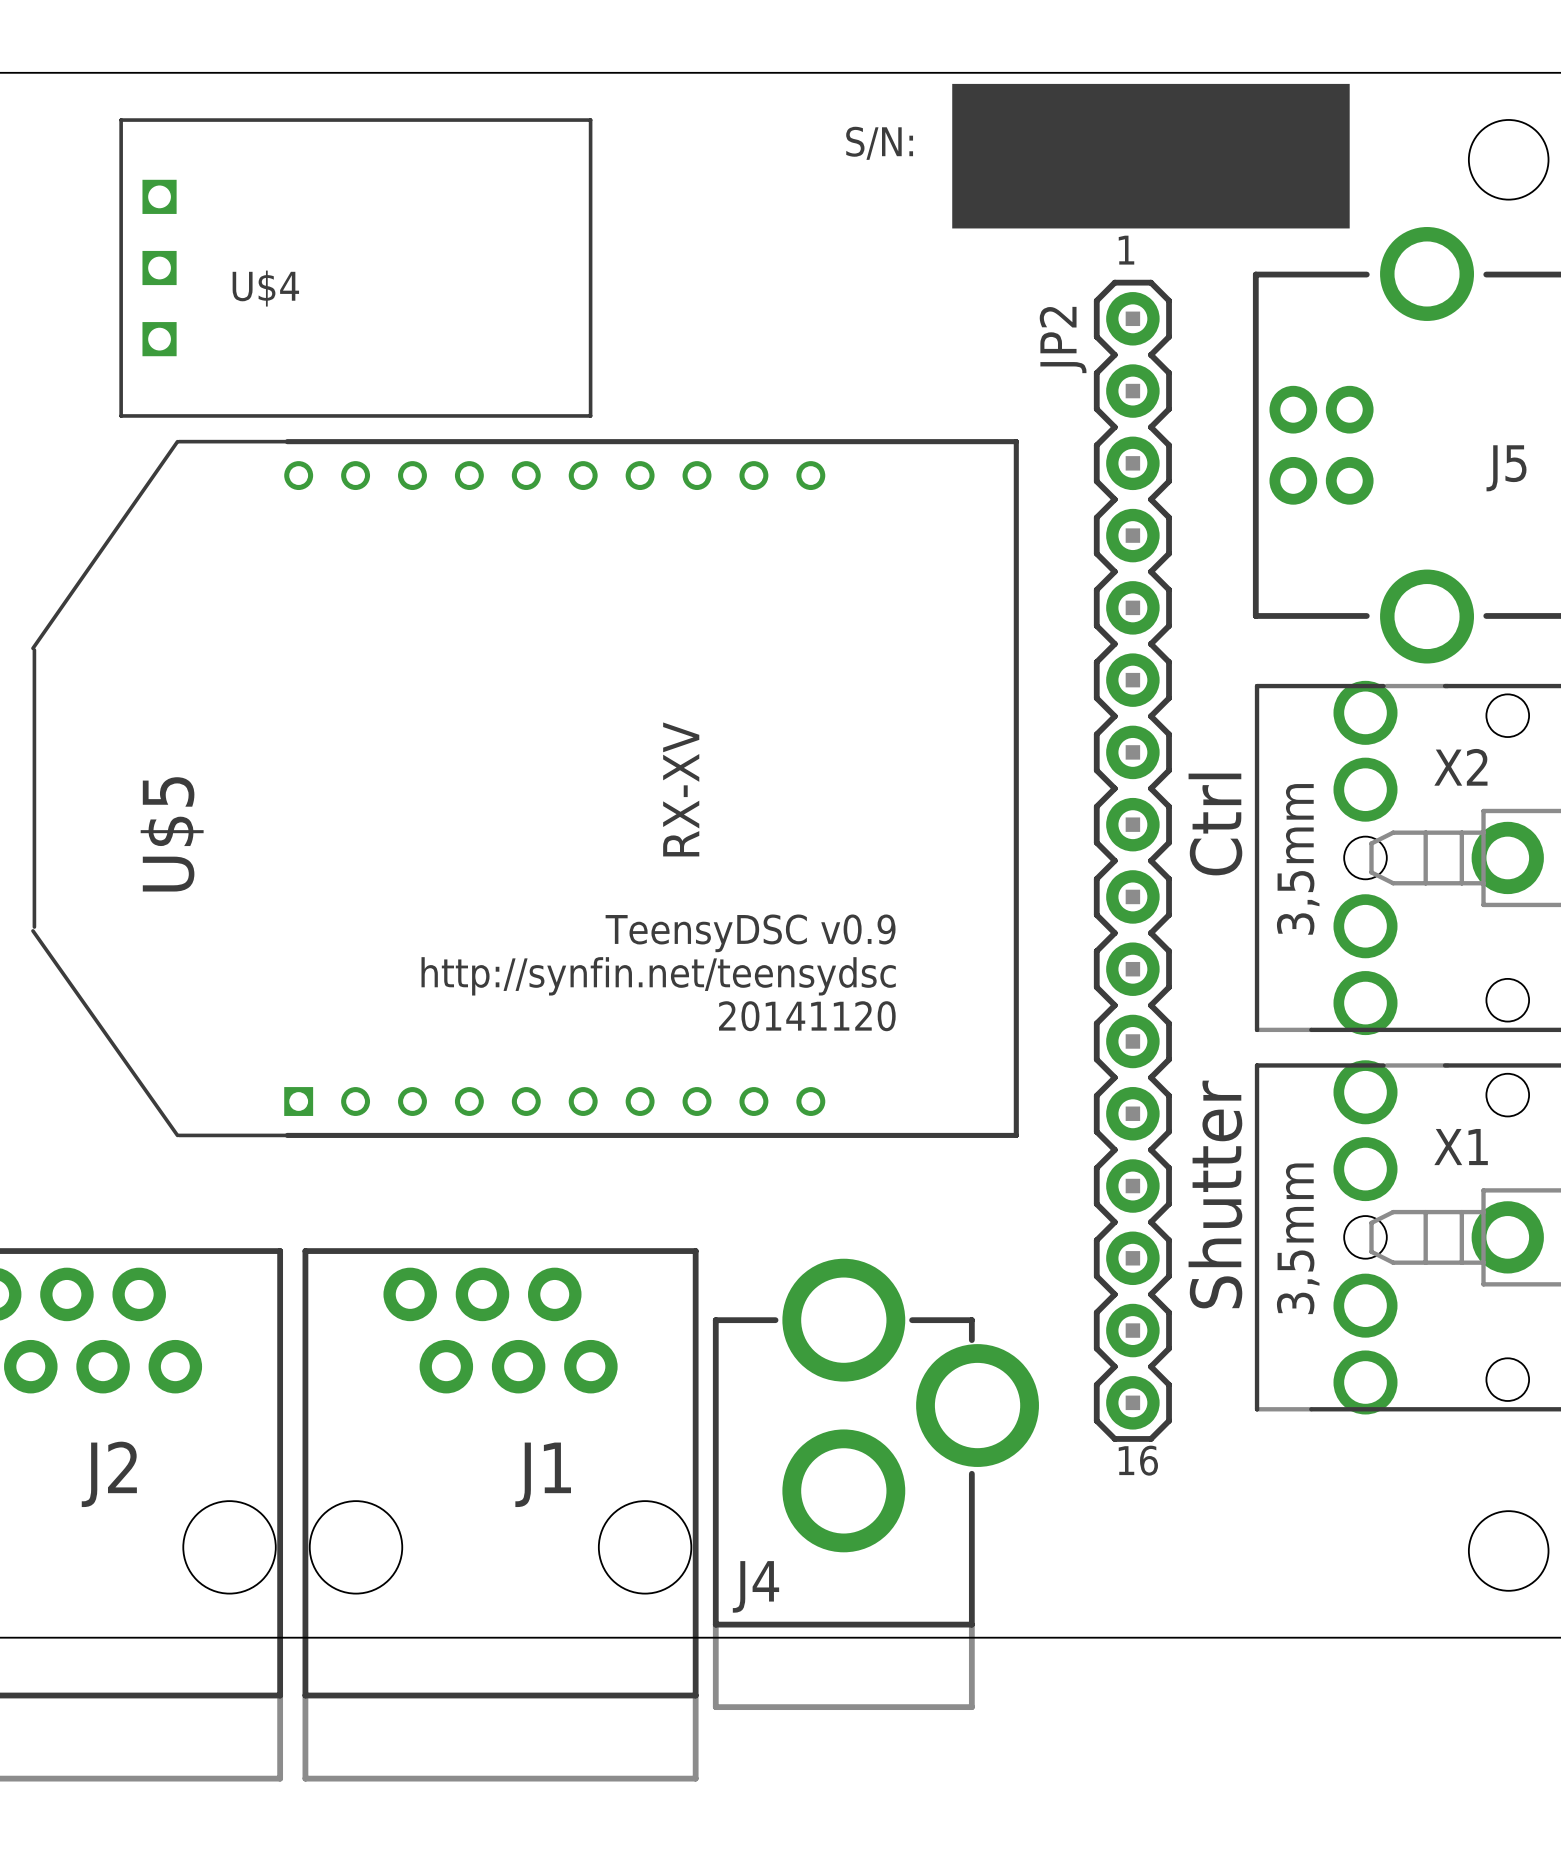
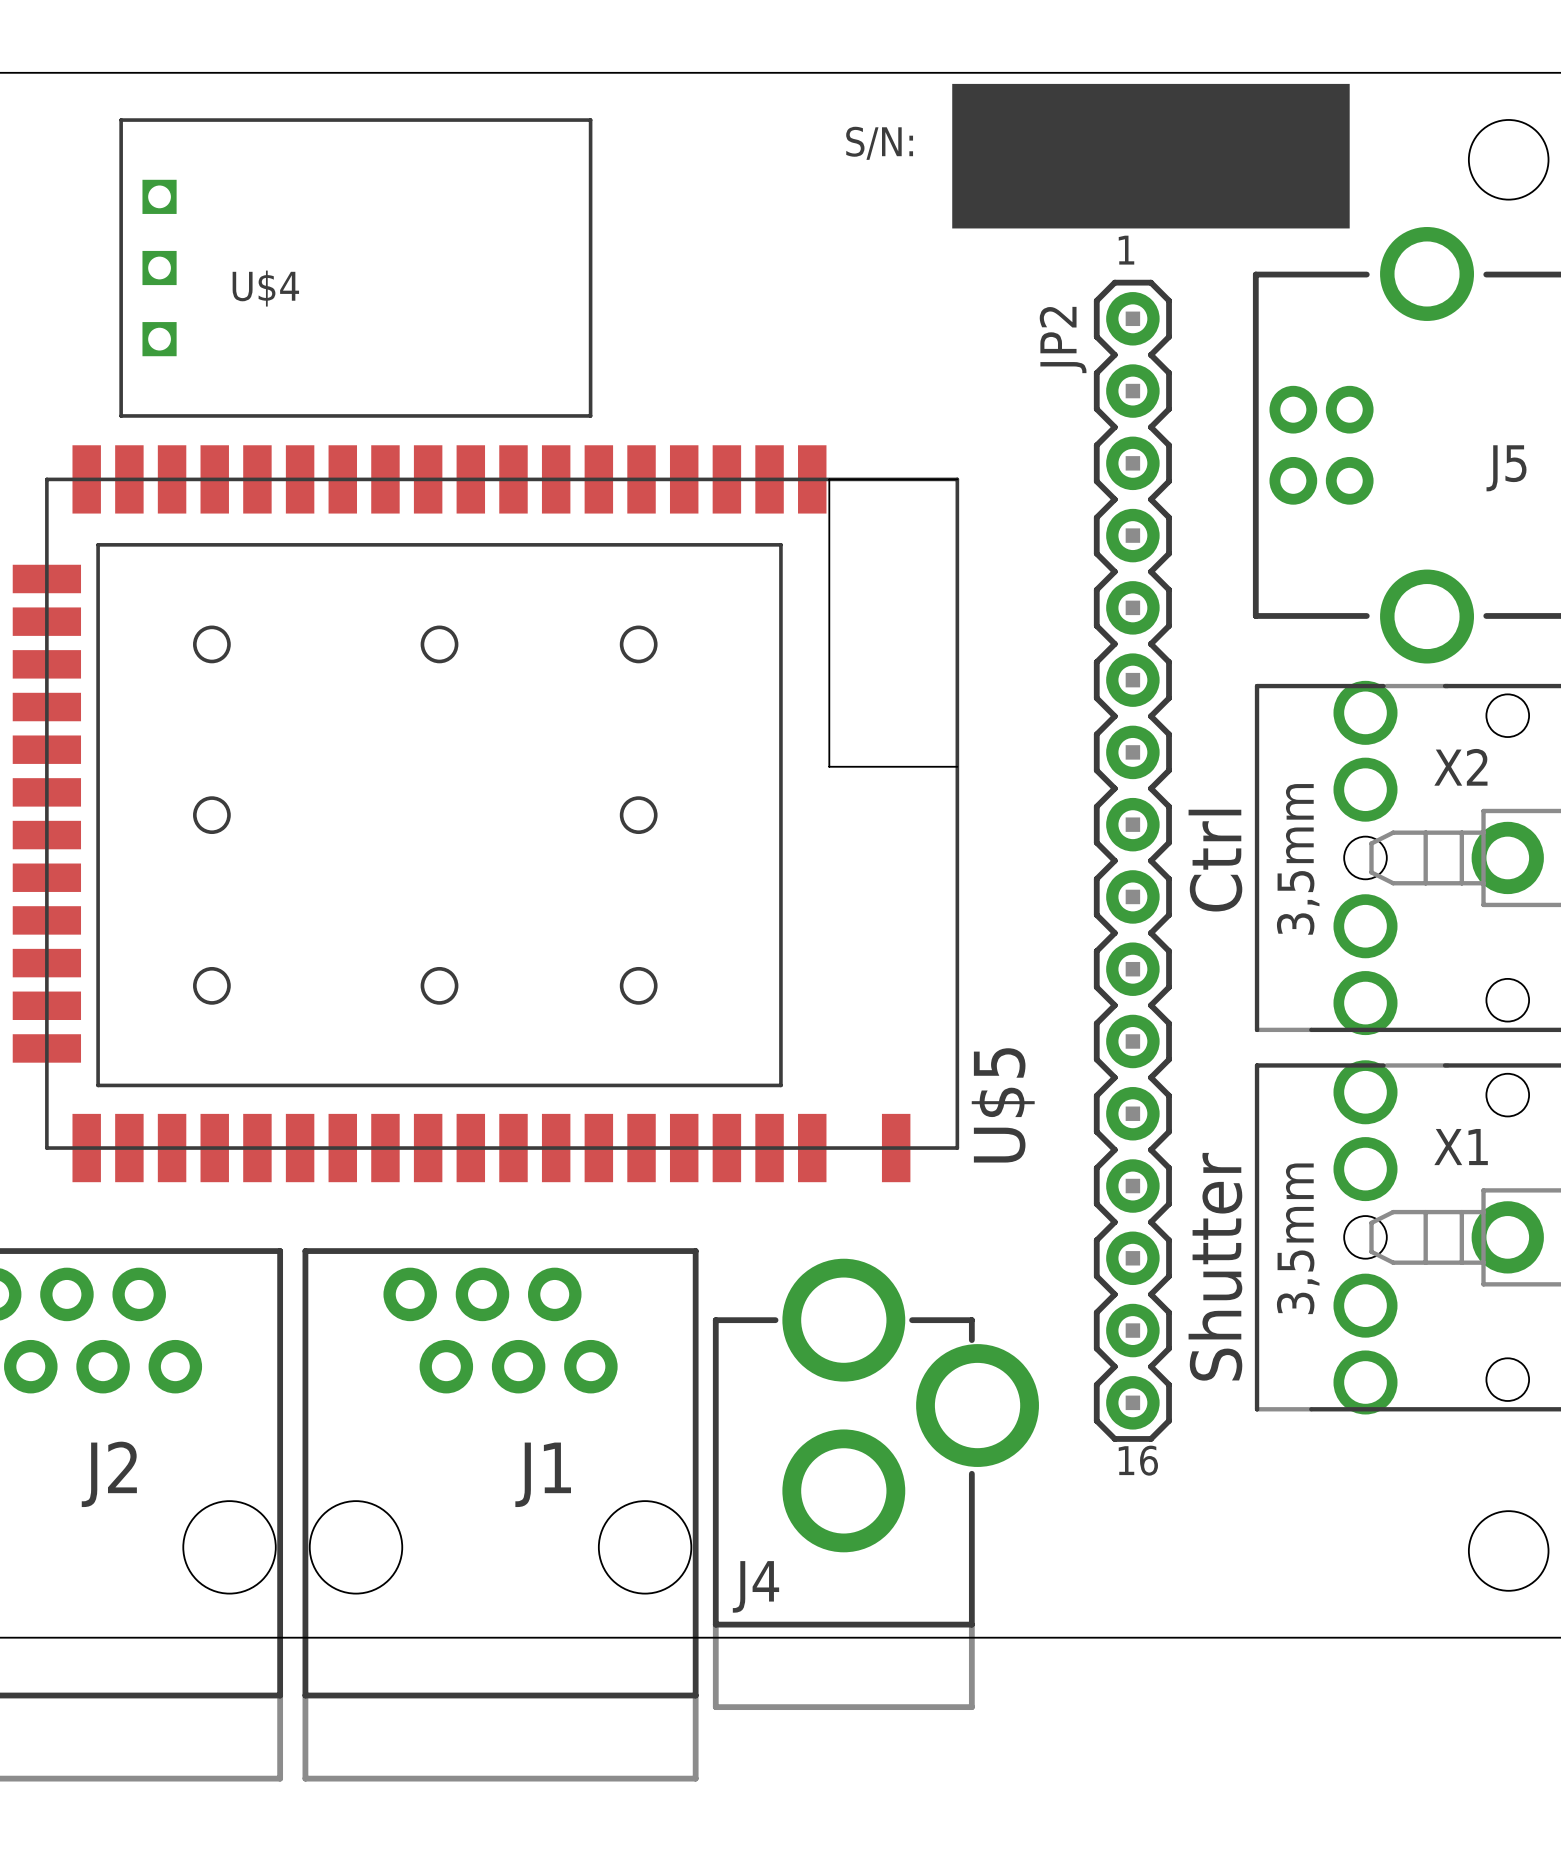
U$5 footprint: [31, 439, 1019, 1138] -> [12, 445, 960, 1183]
text position: Ctrl (1215, 824) -> Ctrl (1215, 860)
U$5 name position: U$5 (172, 834) -> U$5 (1003, 1105)
text: TeensyDSC v0.9 (750, 933) -> none
text: http://synfin.net/teensydsc (658, 976) -> none
text: 20141120 (807, 1016) -> none
text position: Shutter (1215, 1194) -> Shutter (1215, 1266)

